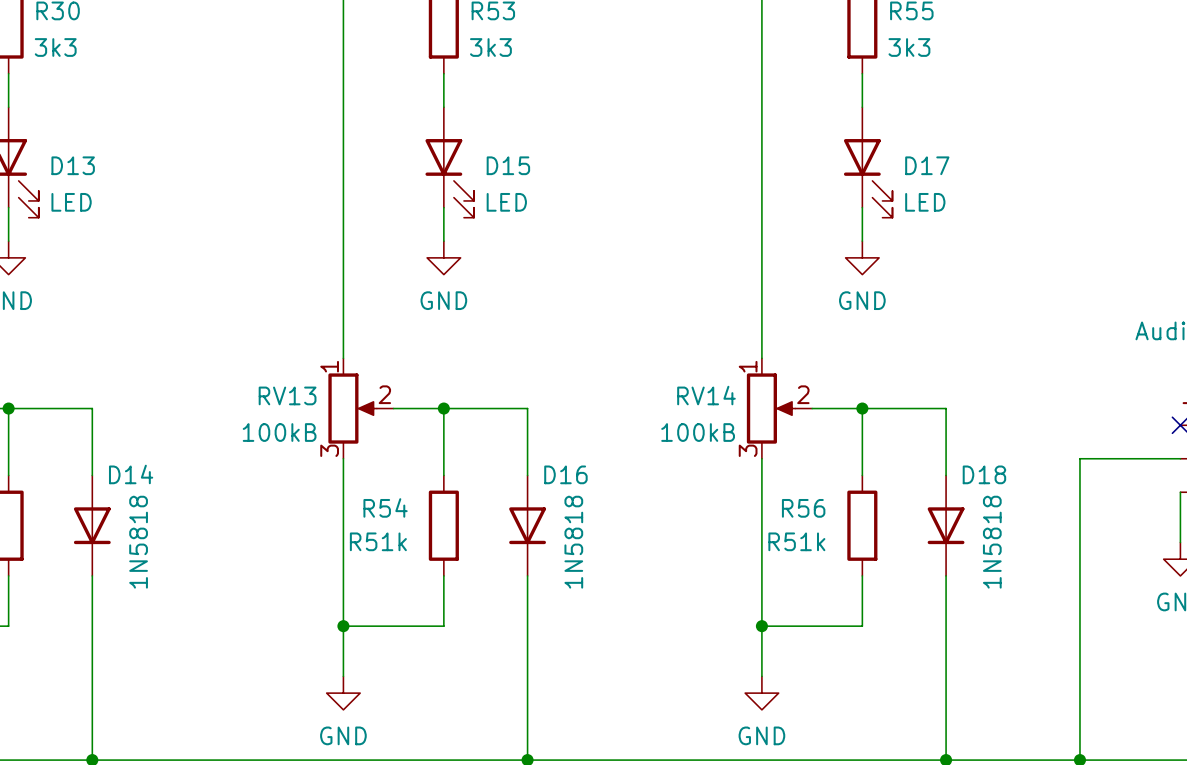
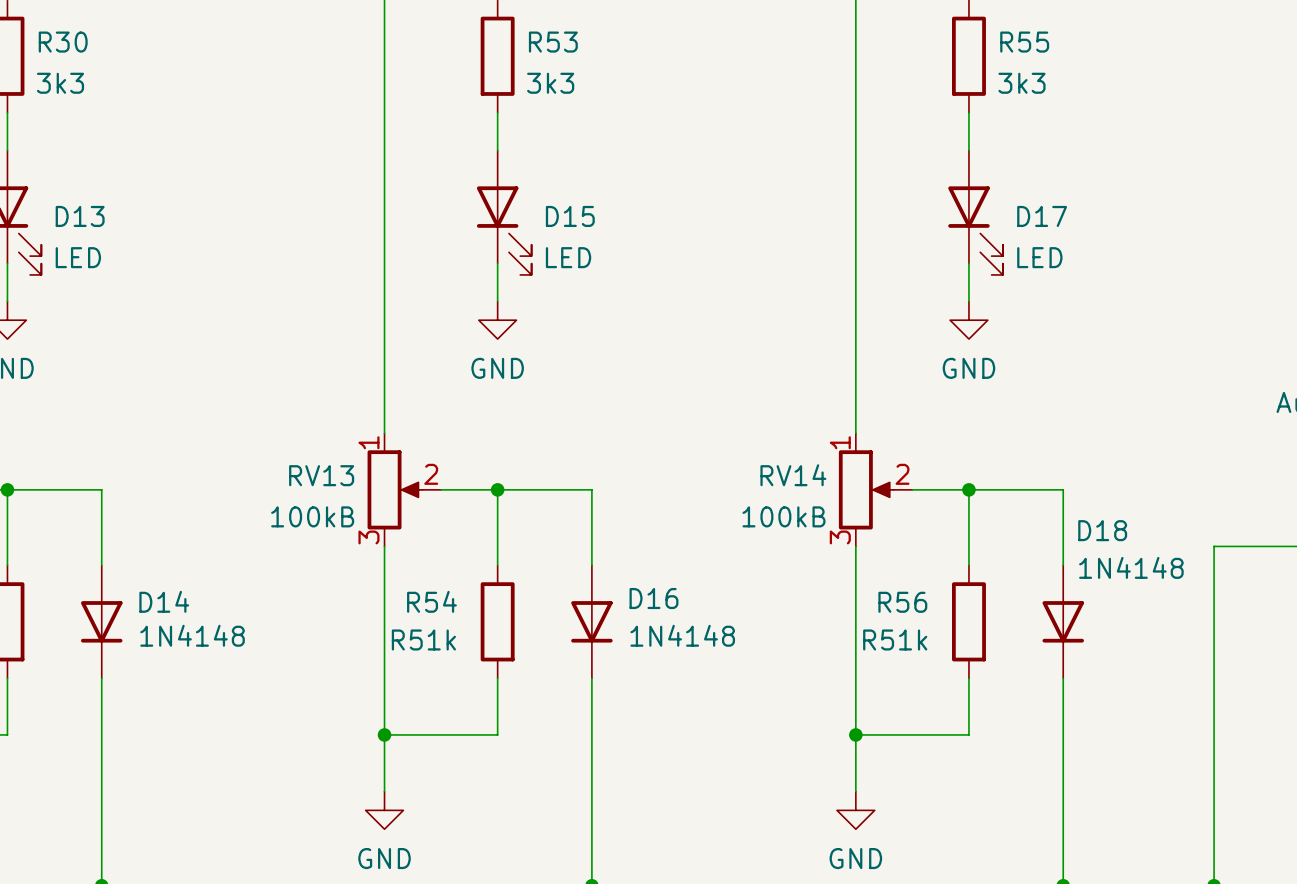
D14 name position: D14 (131, 474) -> D14 (164, 601)
D16 name position: D16 (565, 474) -> D16 (653, 598)
D18 name position: D18 (984, 474) -> D18 (1102, 530)
D14 value: 1N5818 (138, 542) -> 1N4148 (192, 635)
D16 value: 1N5818 (573, 542) -> 1N4148 (682, 635)
D18 value: 1N5818 (992, 542) -> 1N4148 (1131, 567)

